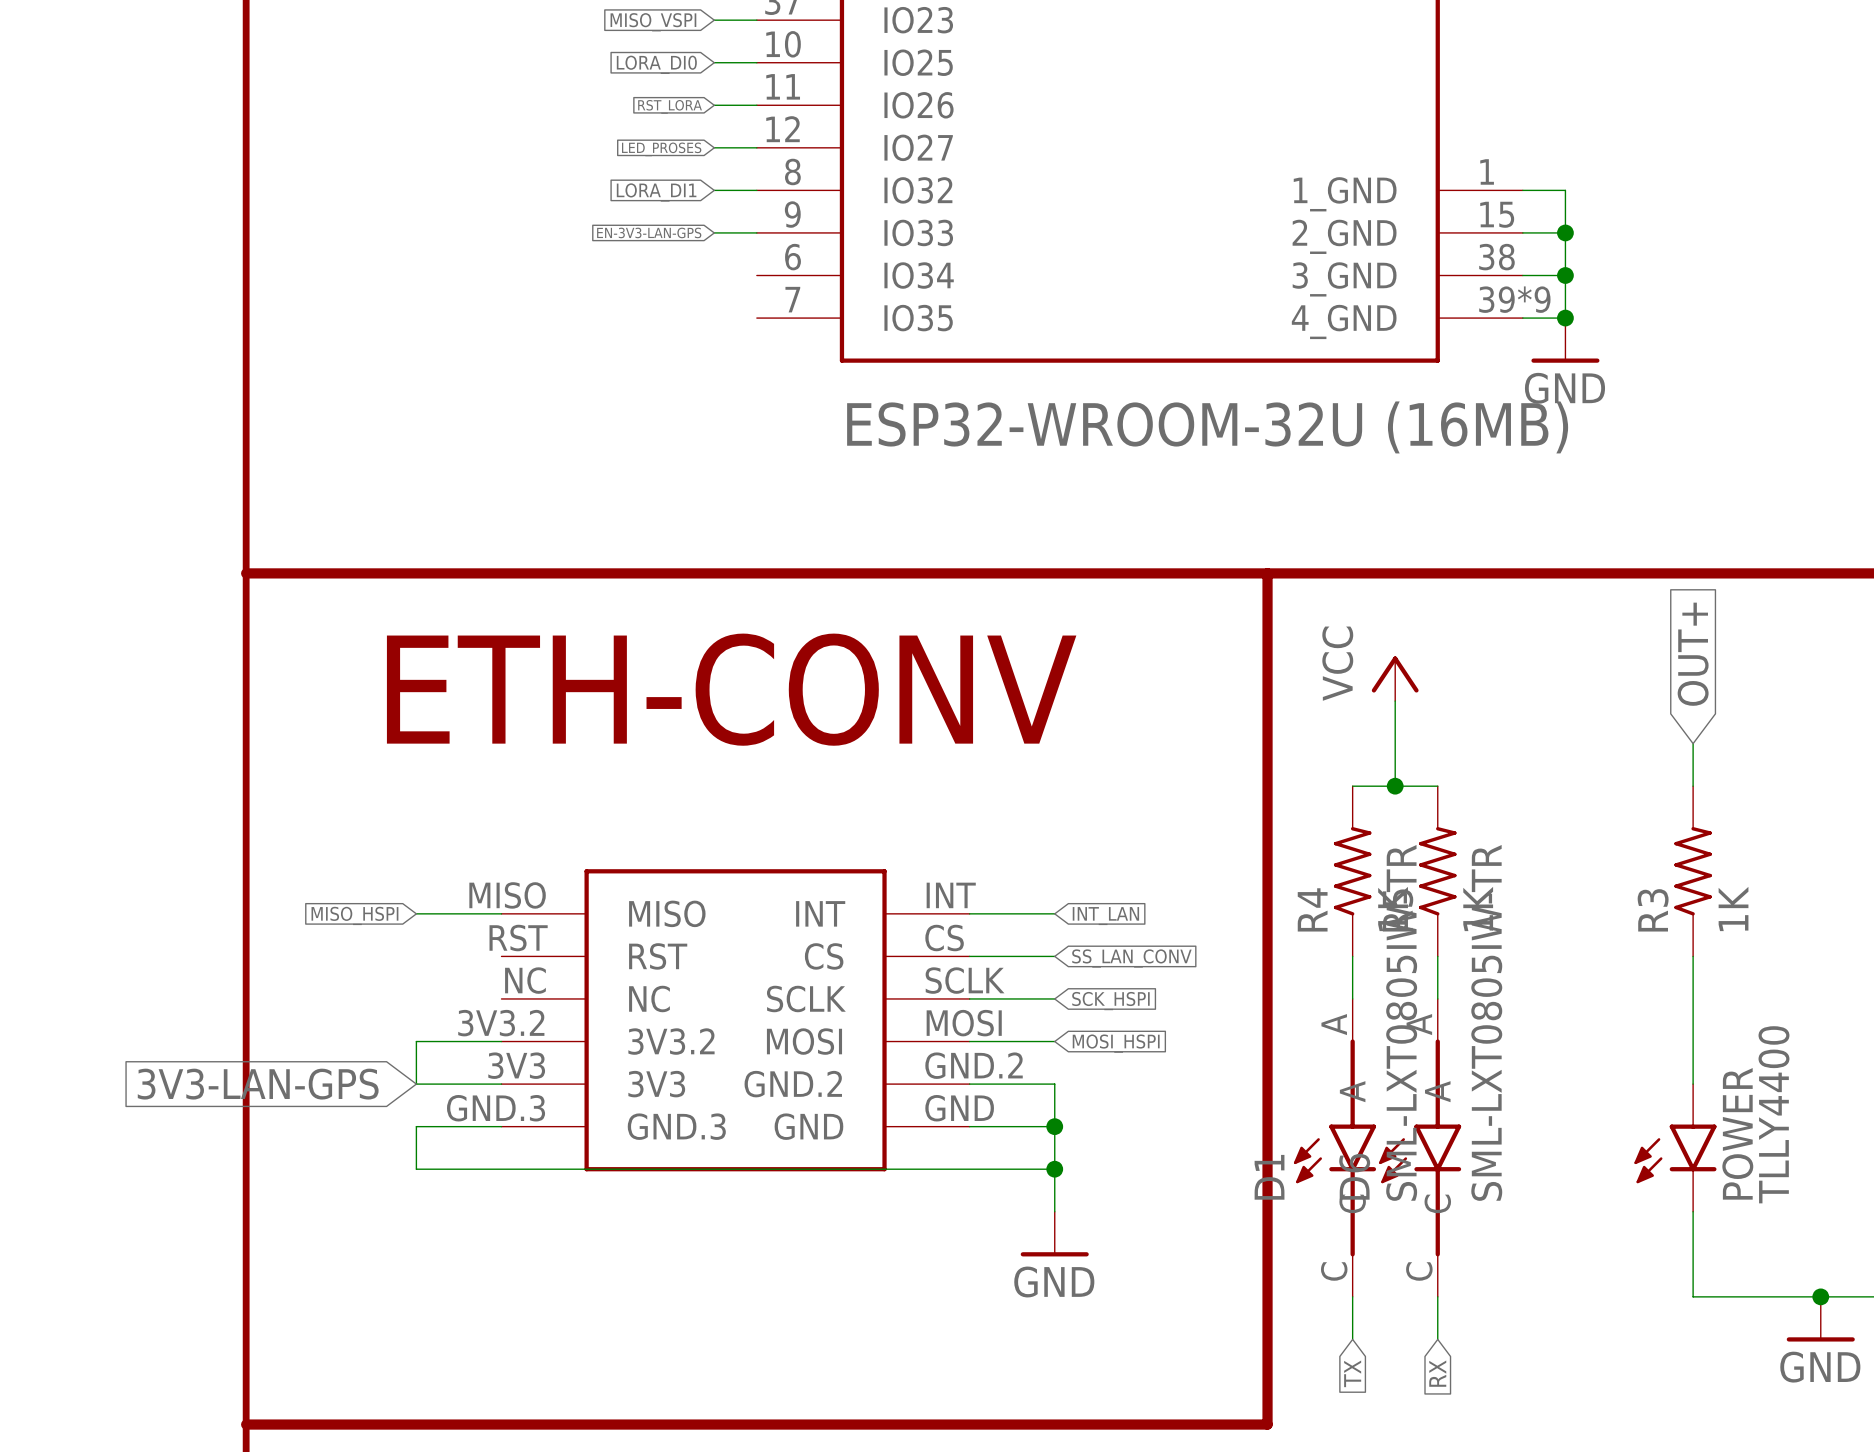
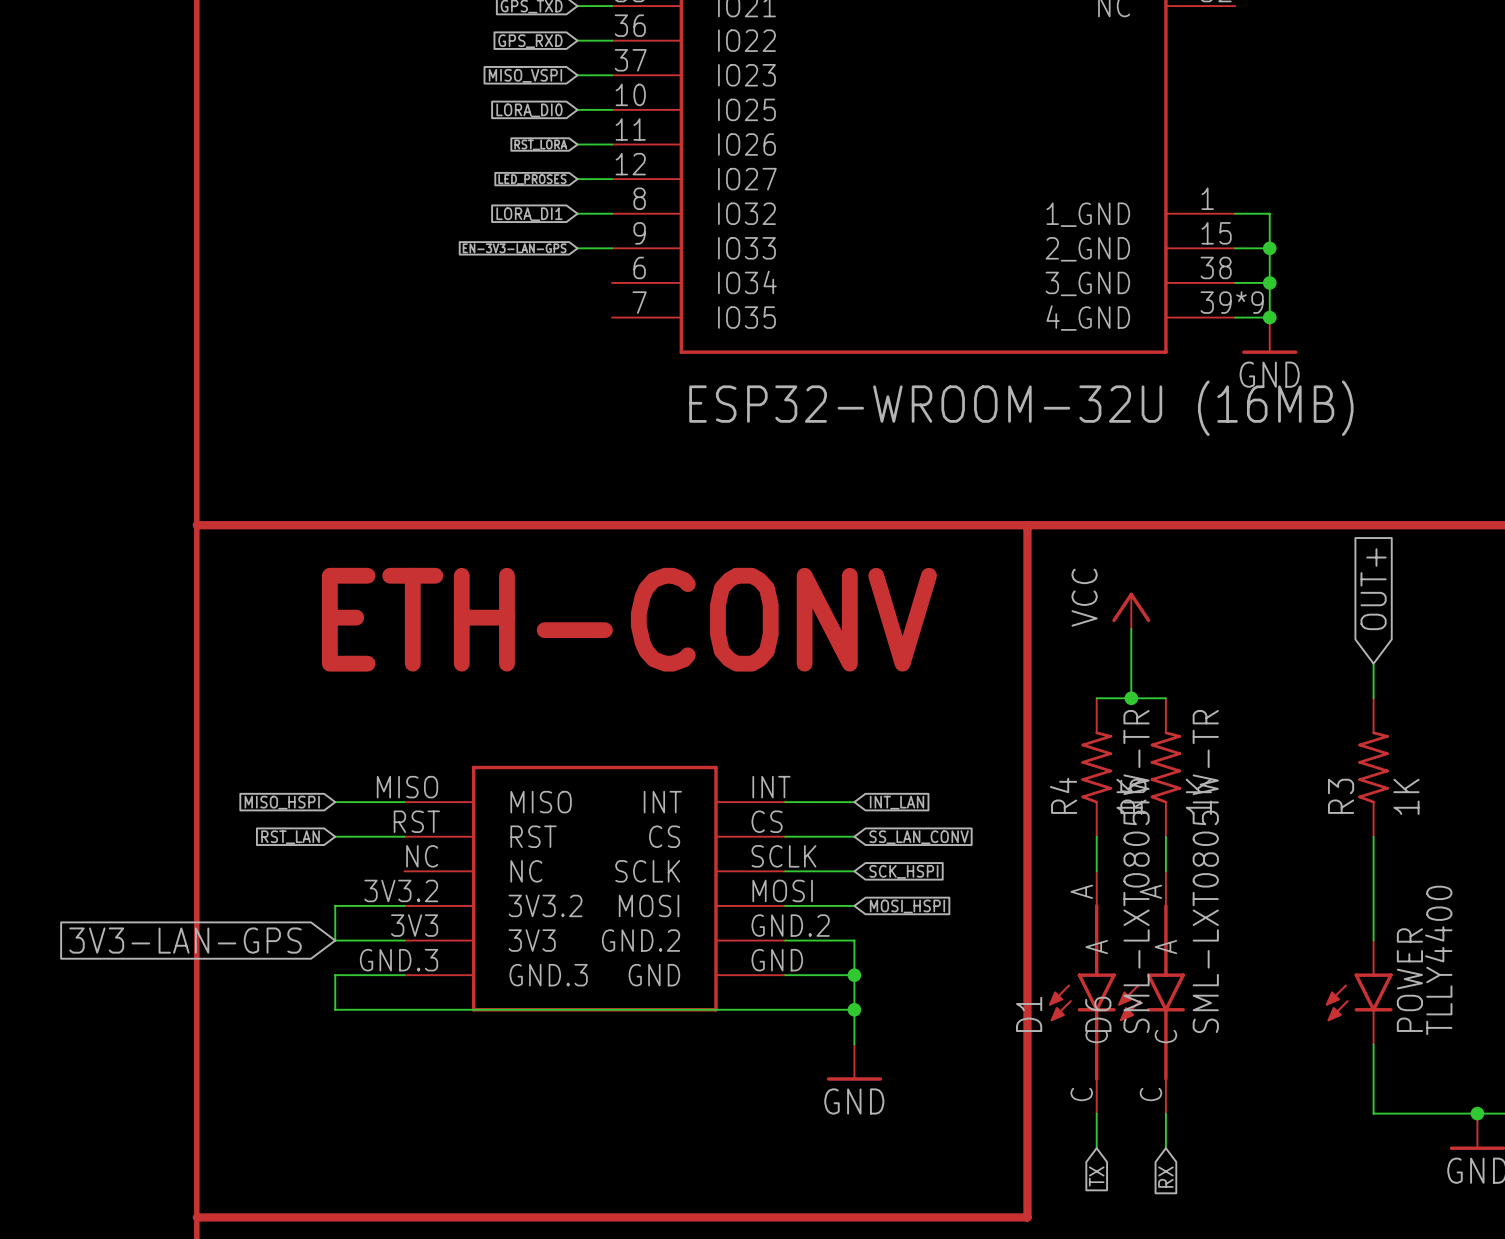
wire: none -> (335, 836) (404, 836)
global label: none -> RST_LAN (290, 837)

